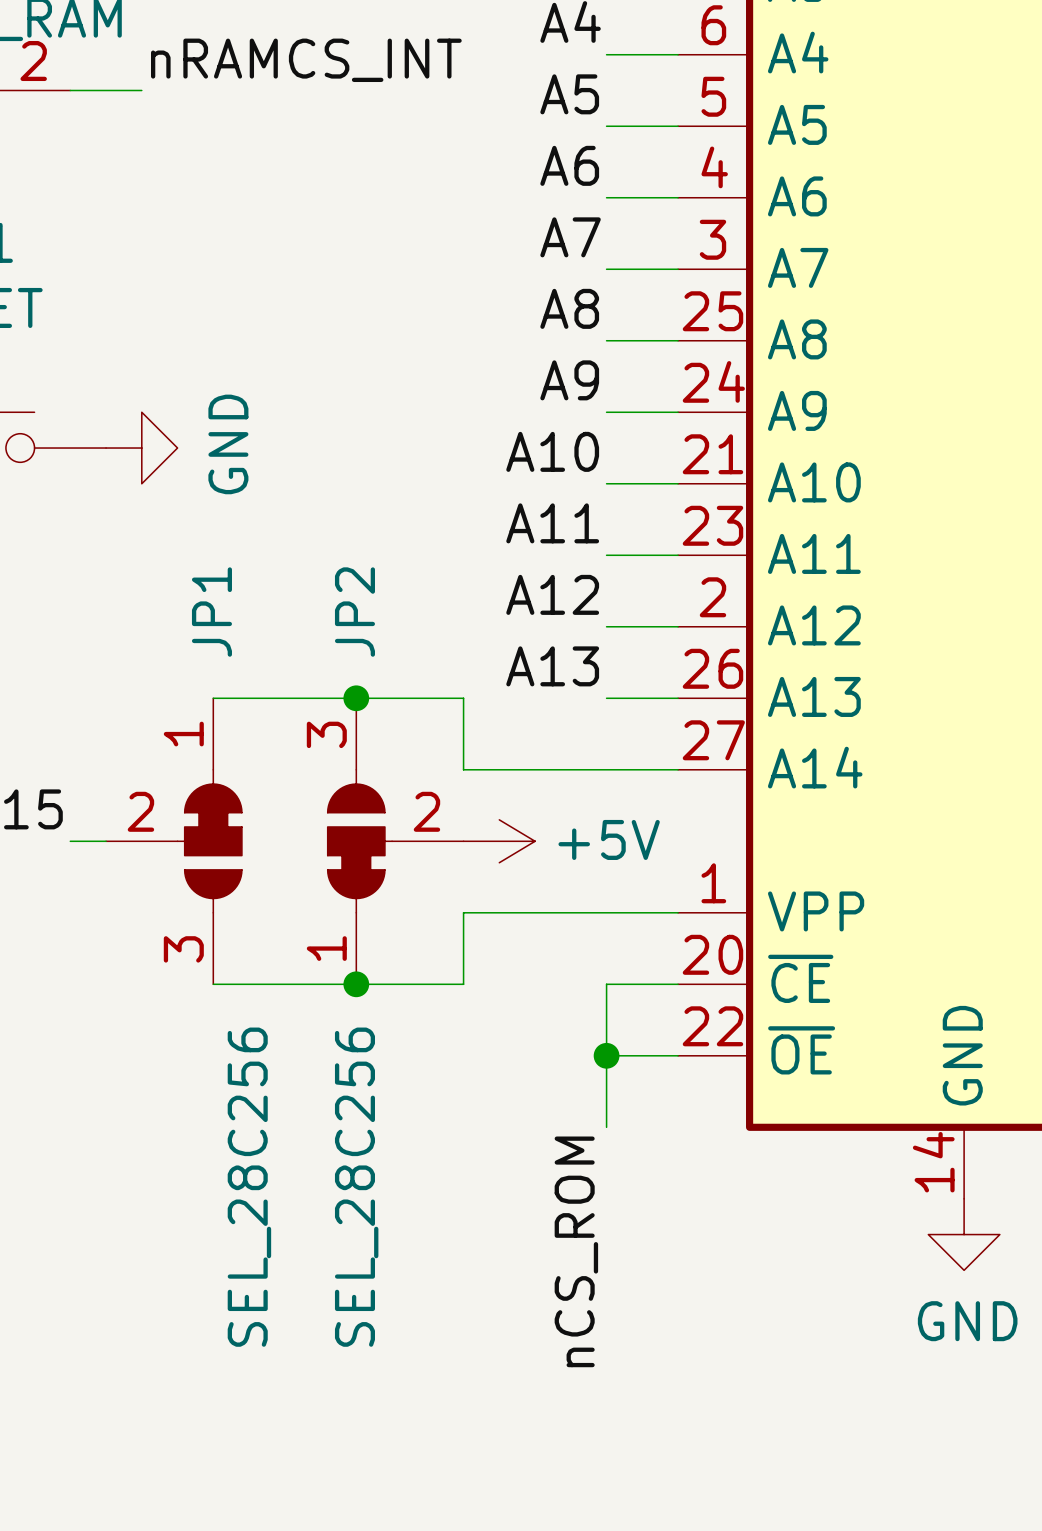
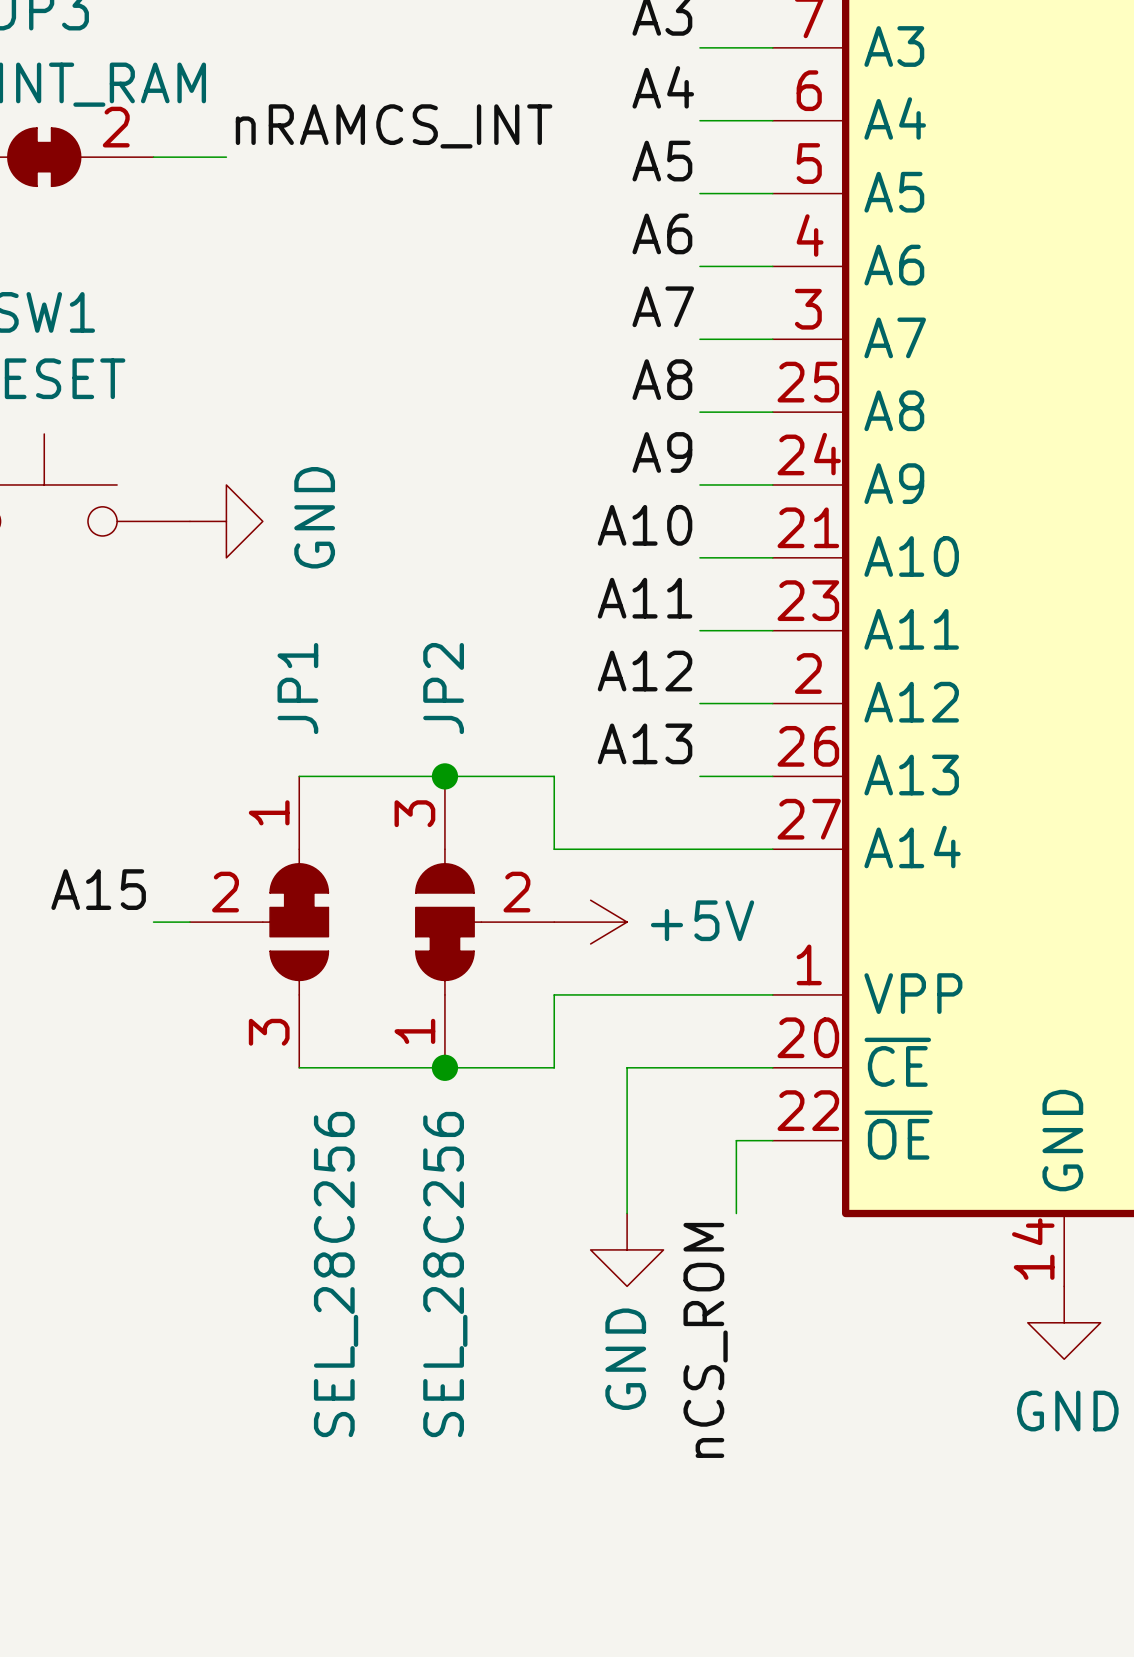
wire: (606, 984) (606, 1127) -> (699, 1067) (627, 1067) (627, 1213)
wire: (606, 1055) (642, 1055) -> (736, 1213) (736, 1140)
junction: (606, 1055) -> none
power symbol: none -> GND (627, 1249)
label position: nCS_ROM (576, 1251) -> nCS_ROM (705, 1340)

